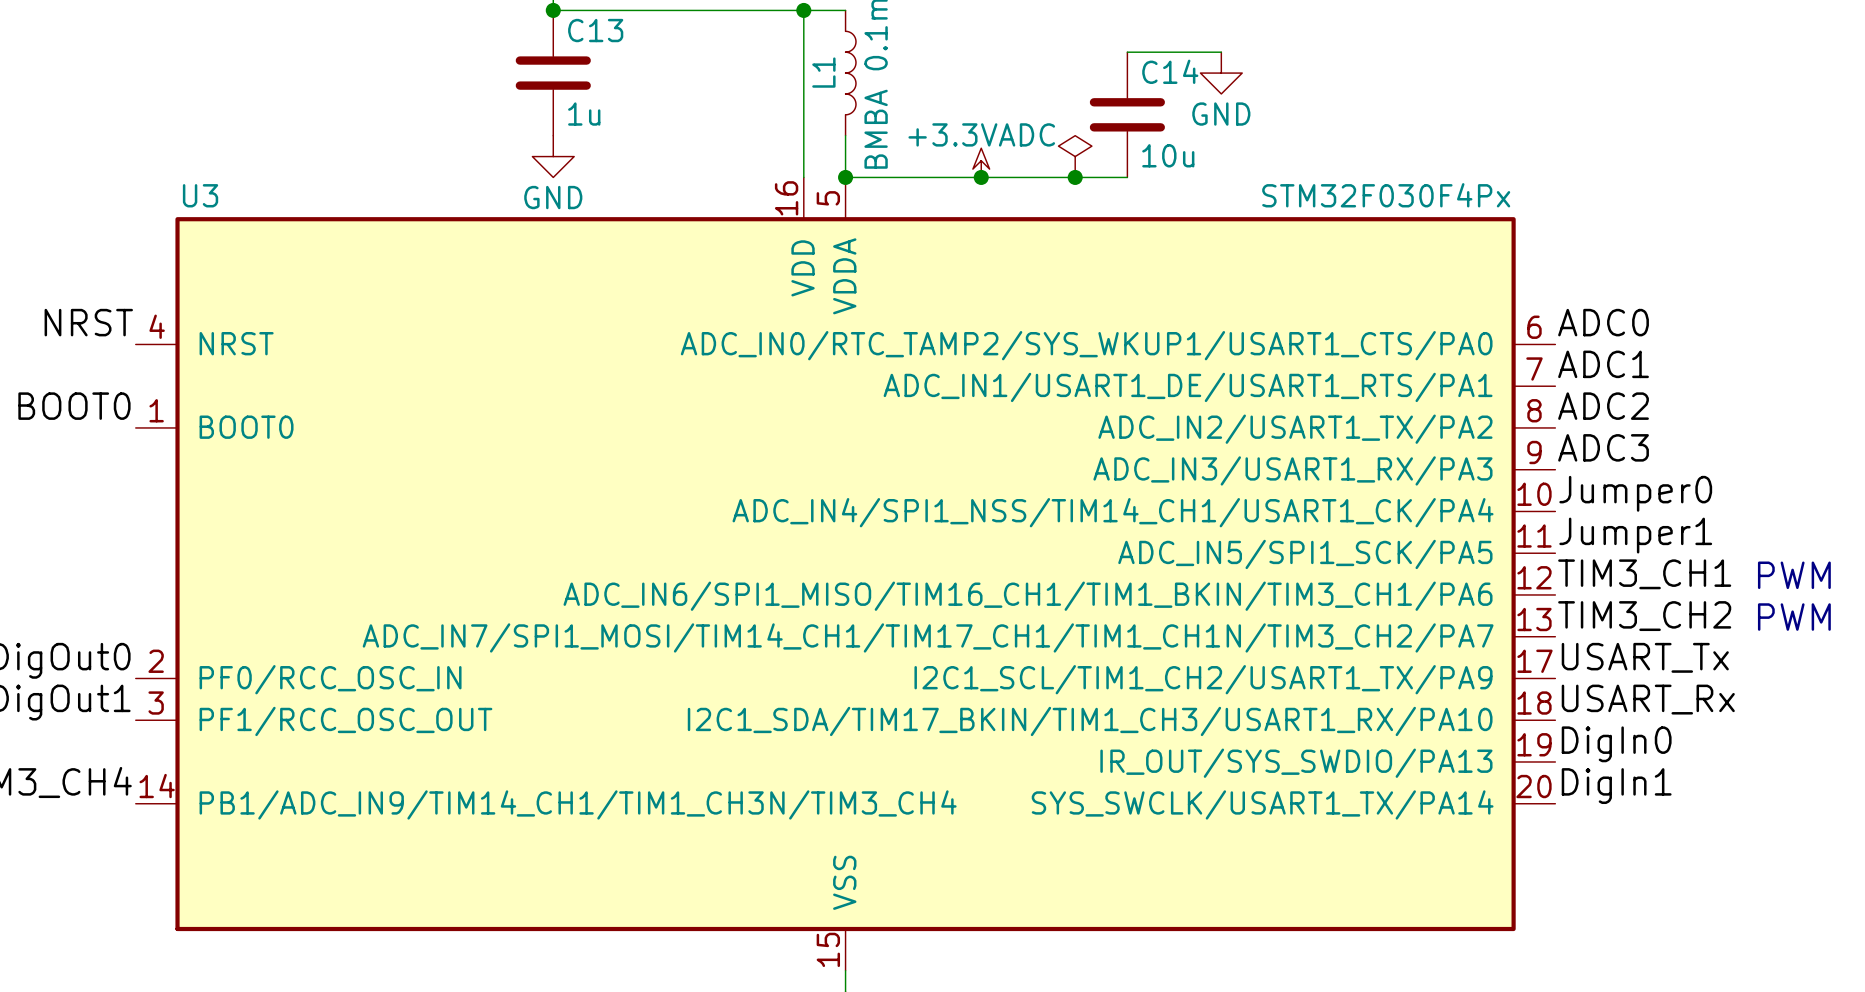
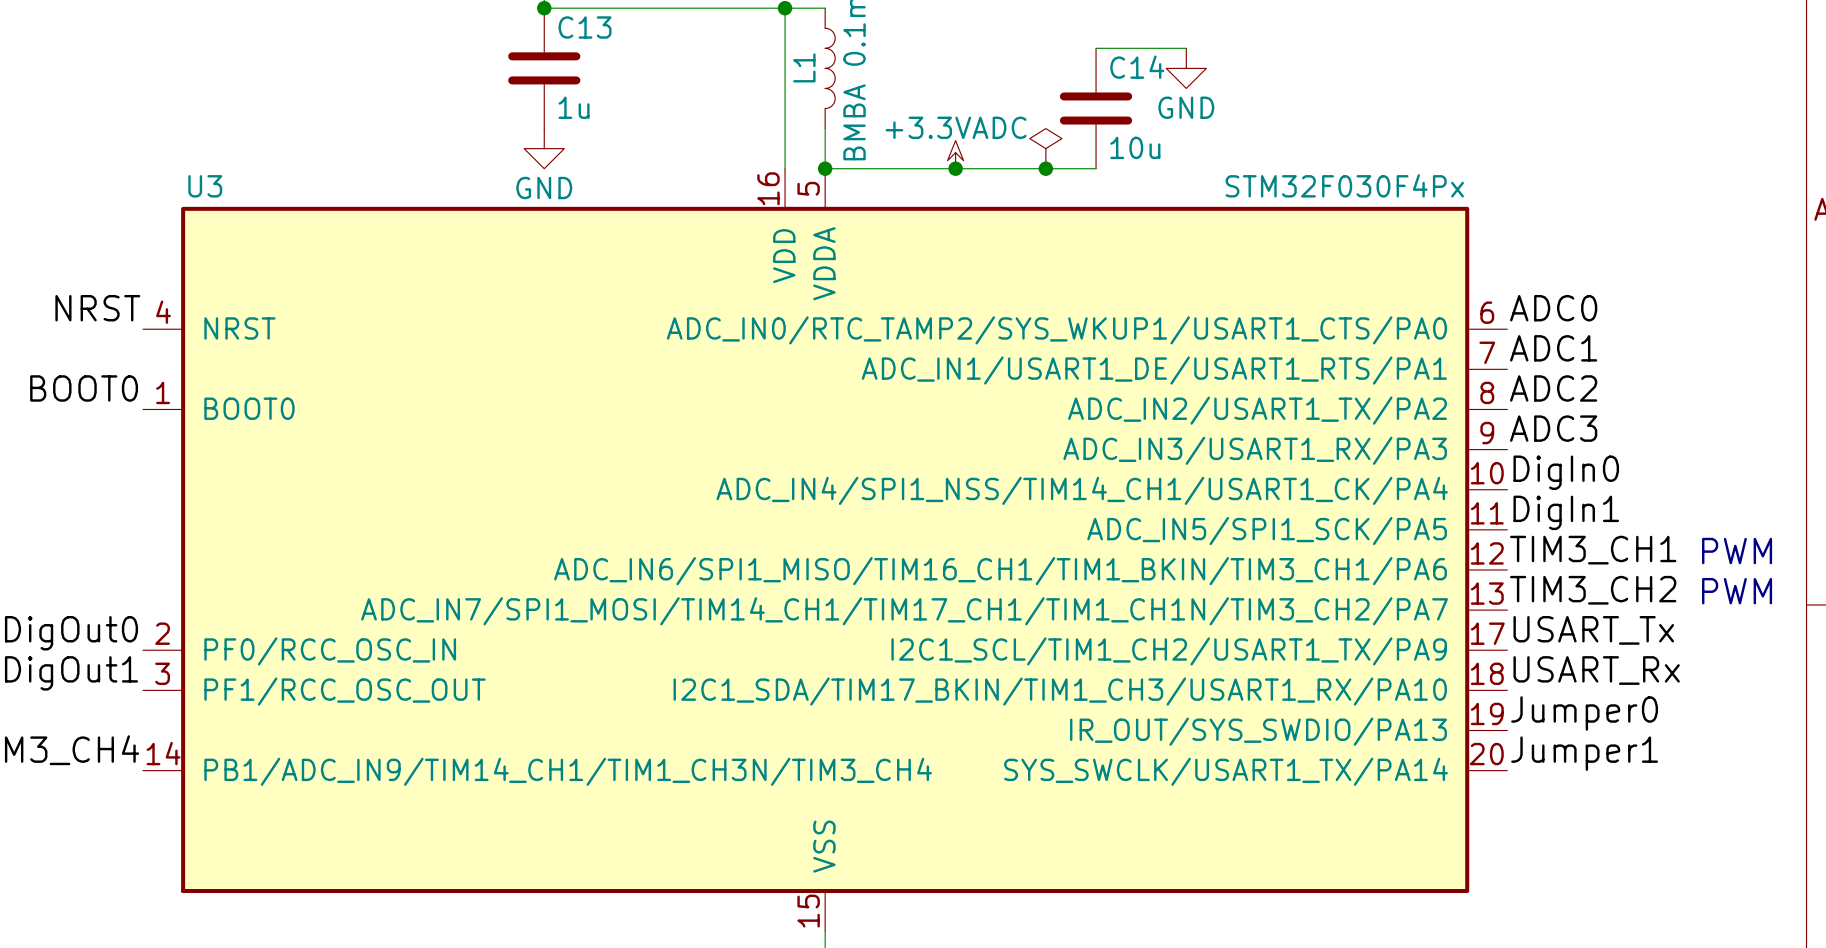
label: Jumper0 (1635, 493) -> DigIn0 (1566, 472)
label: Jumper1 (1635, 535) -> DigIn1 (1566, 512)
label: DigIn0 (1616, 744) -> Jumper0 (1584, 713)
label: DigIn1 (1616, 786) -> Jumper1 (1584, 753)

